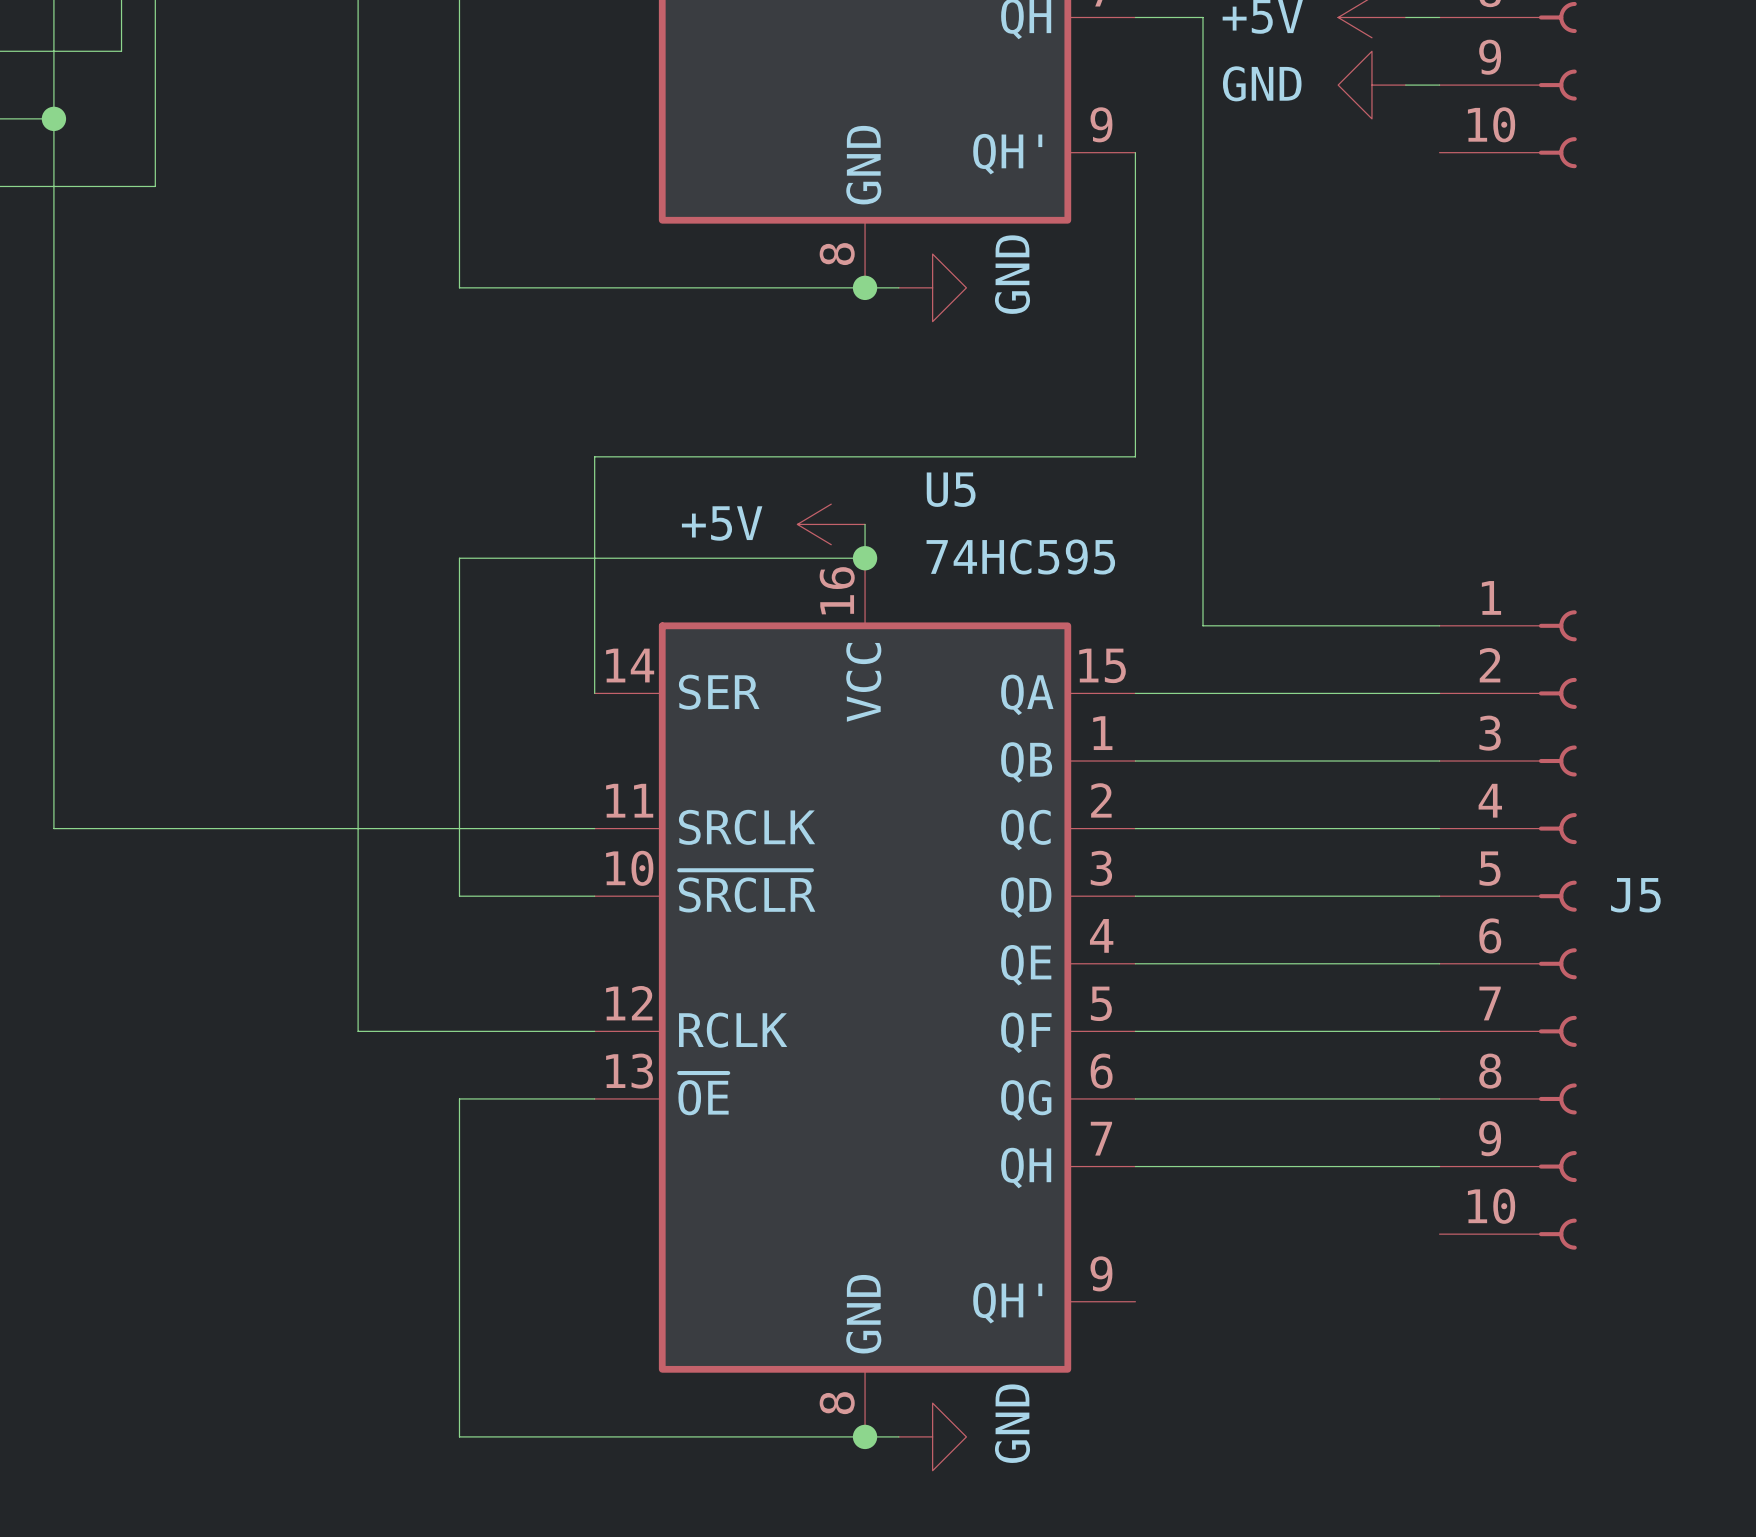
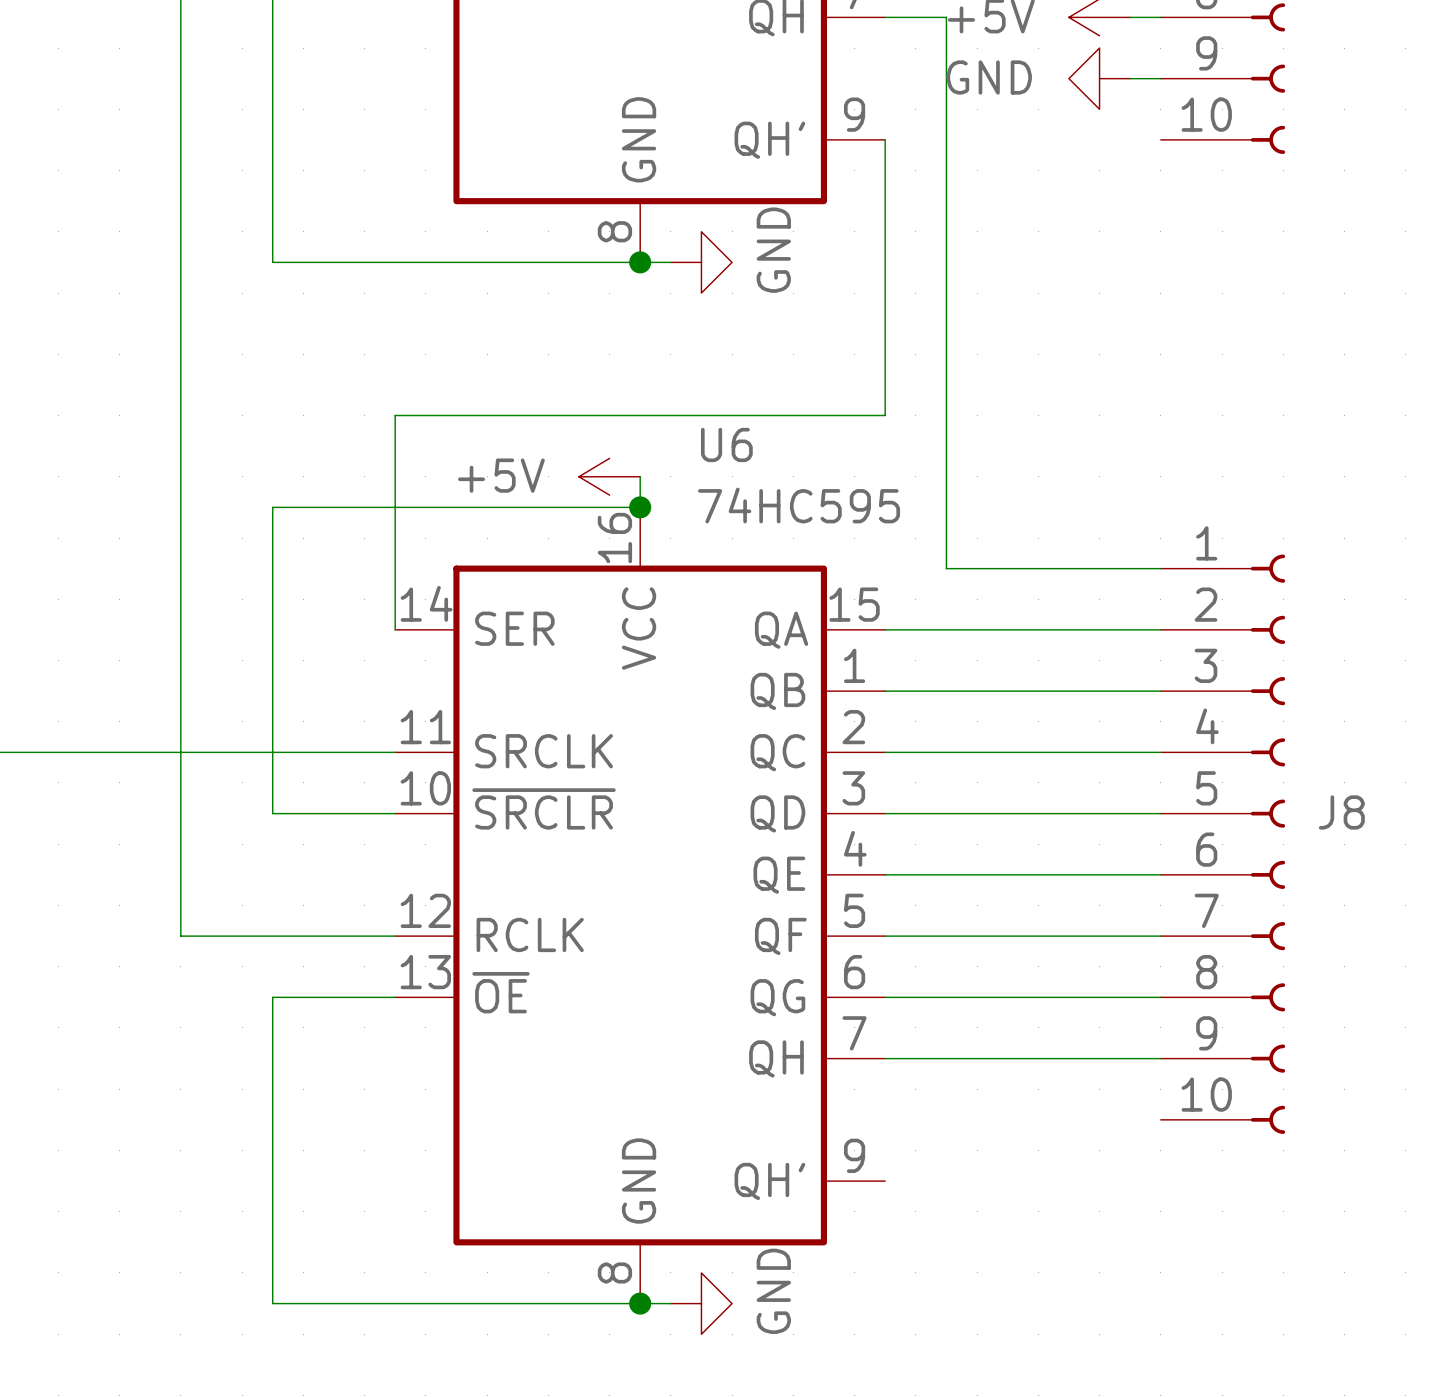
U5 name: U5 (951, 489) -> U6 (726, 444)
J5 name: J5 (1635, 895) -> J8 (1341, 812)

